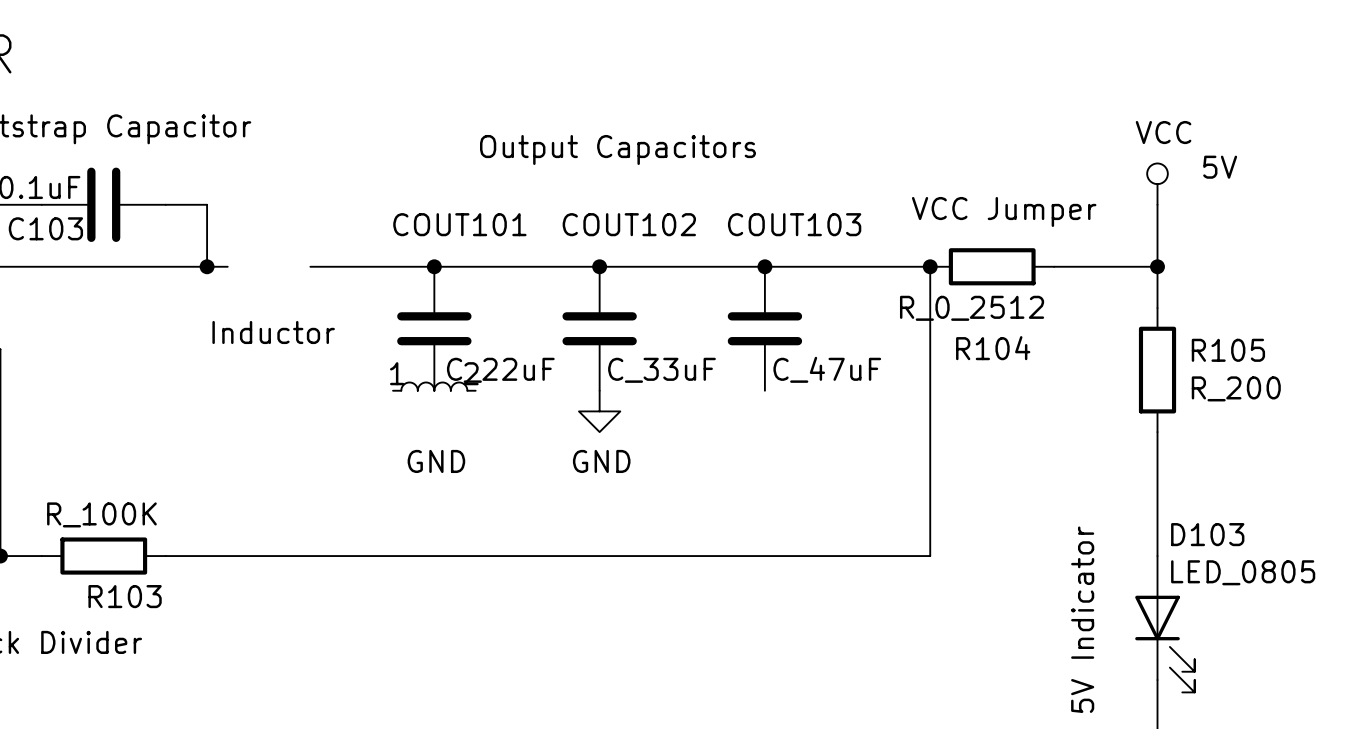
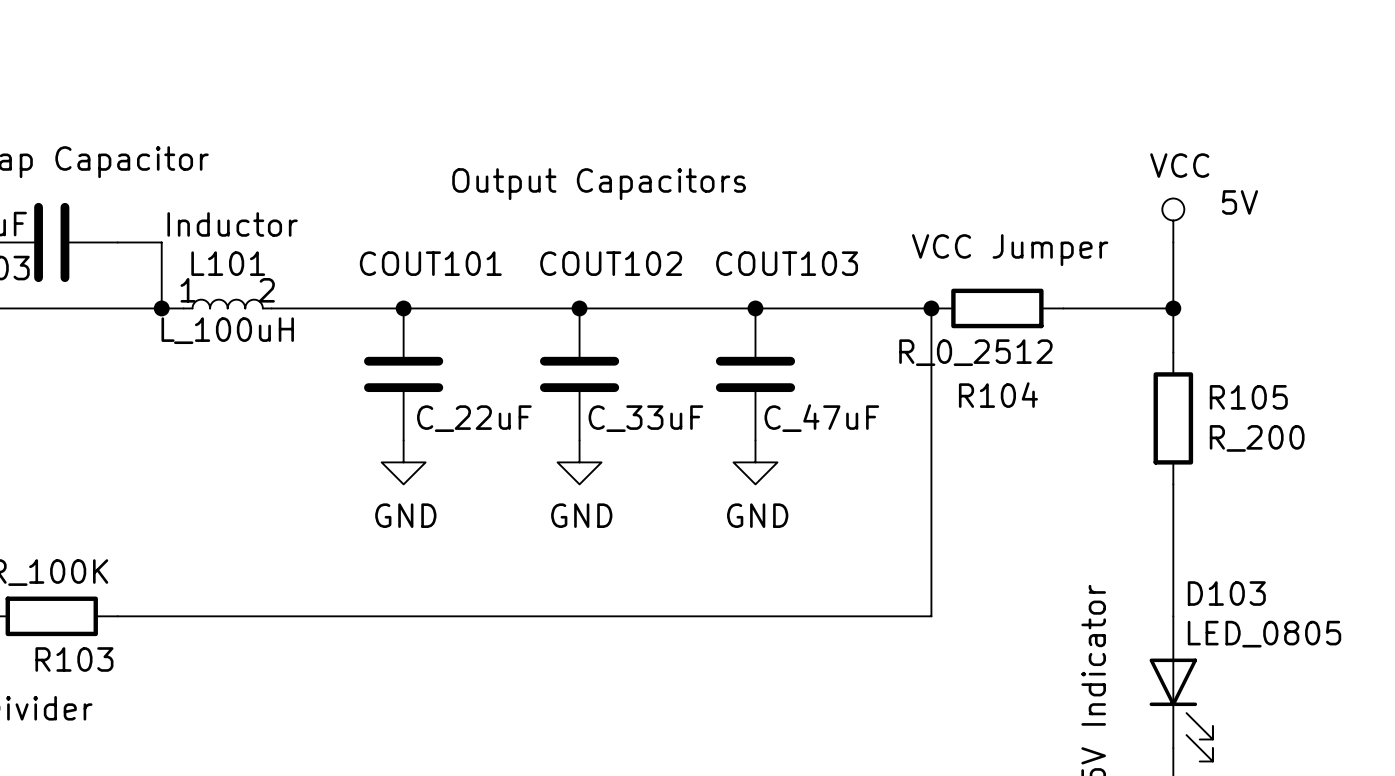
L101: none -> L_100uH (227, 304)
text position: Inductor (273, 332) -> Inductor (232, 224)
power symbol: GND (434, 386) -> none
power symbol: none -> GND (403, 462)
power symbol: none -> GND (755, 462)

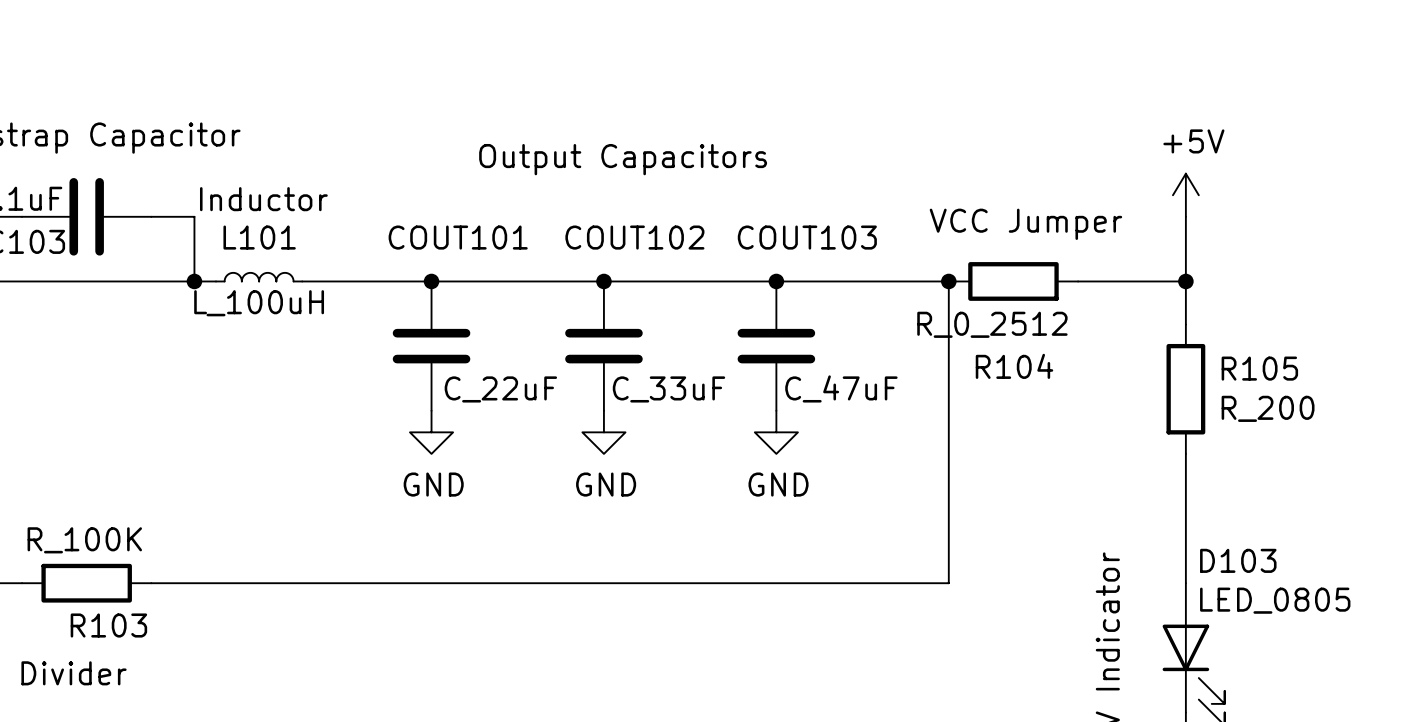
text: 5V (1239, 202) -> none
power symbol: VCC (1173, 220) -> +5V (1185, 195)
L101 pin number: 1 (188, 290) -> none
L101 pin number: 2 (266, 290) -> none

